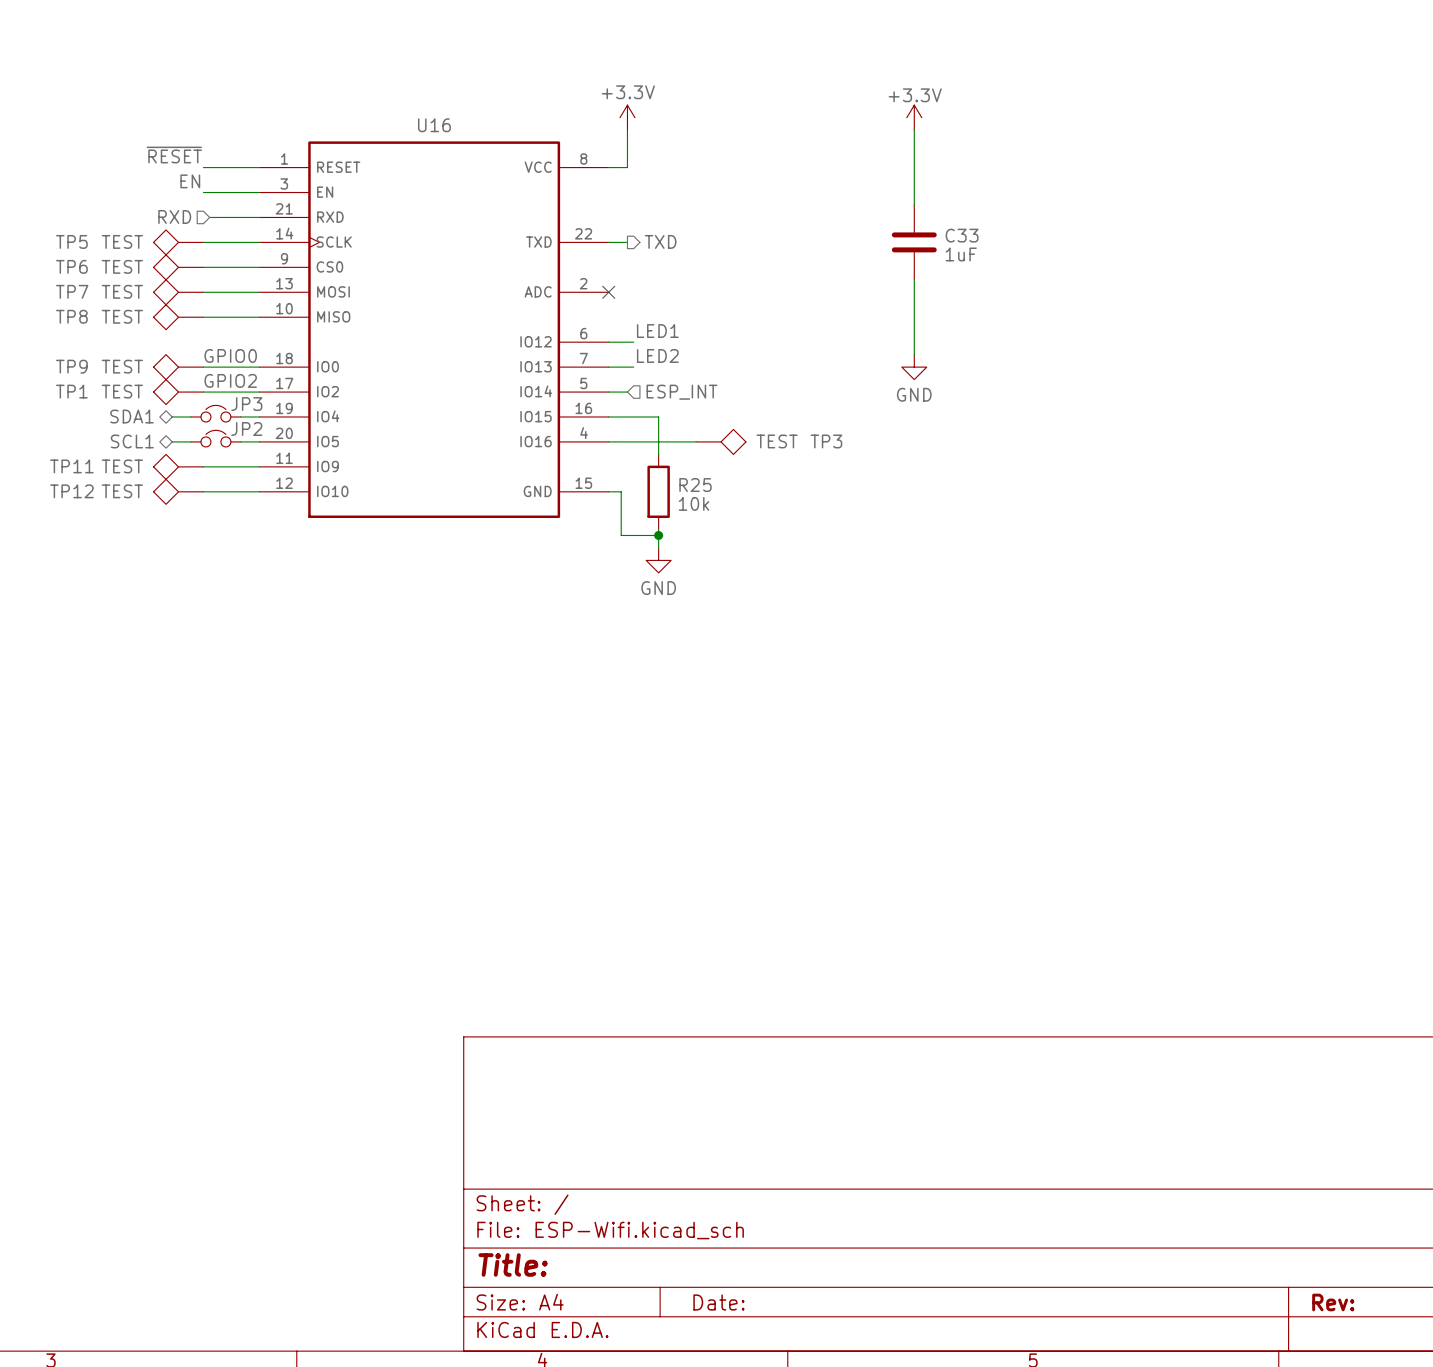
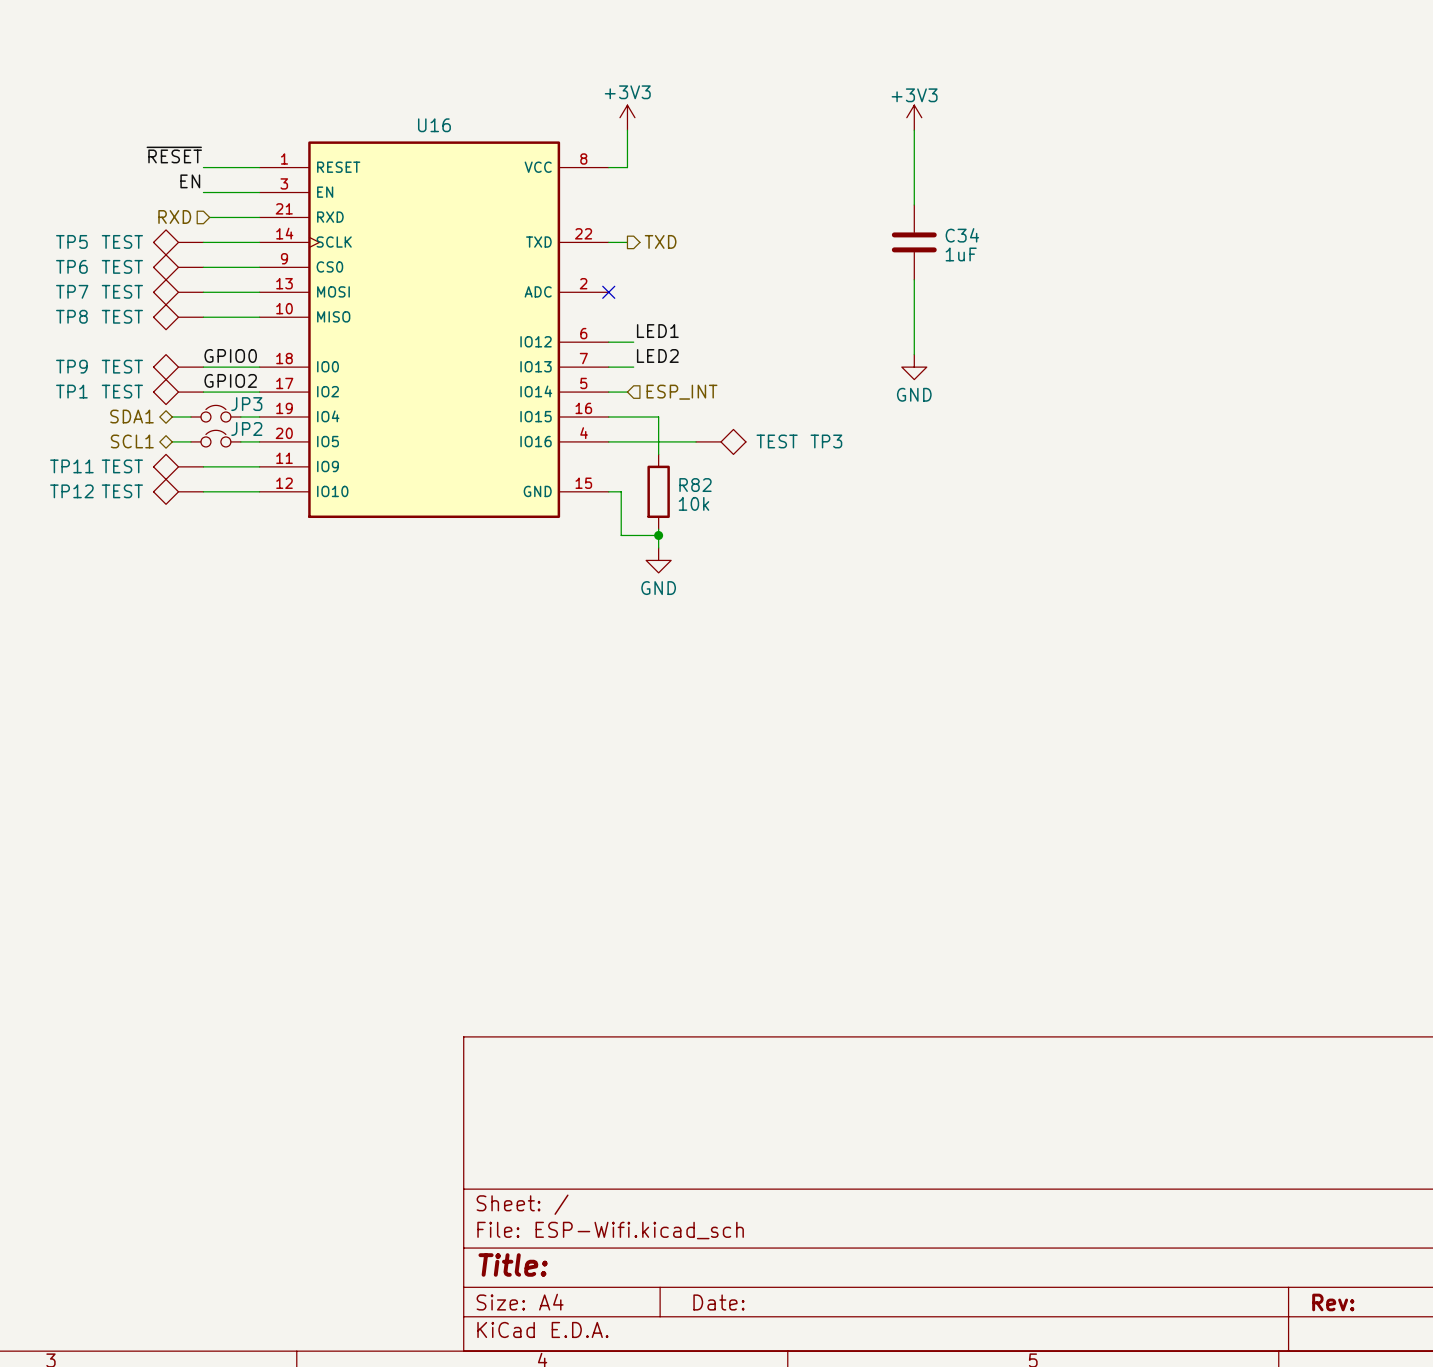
power symbol: +3.3V (627, 117) -> +3V3 (627, 117)
power symbol: +3.3V (914, 117) -> +3V3 (914, 117)
C33 name: C33 (962, 235) -> C34 (962, 235)
R25 name: R25 (695, 485) -> R82 (695, 485)

